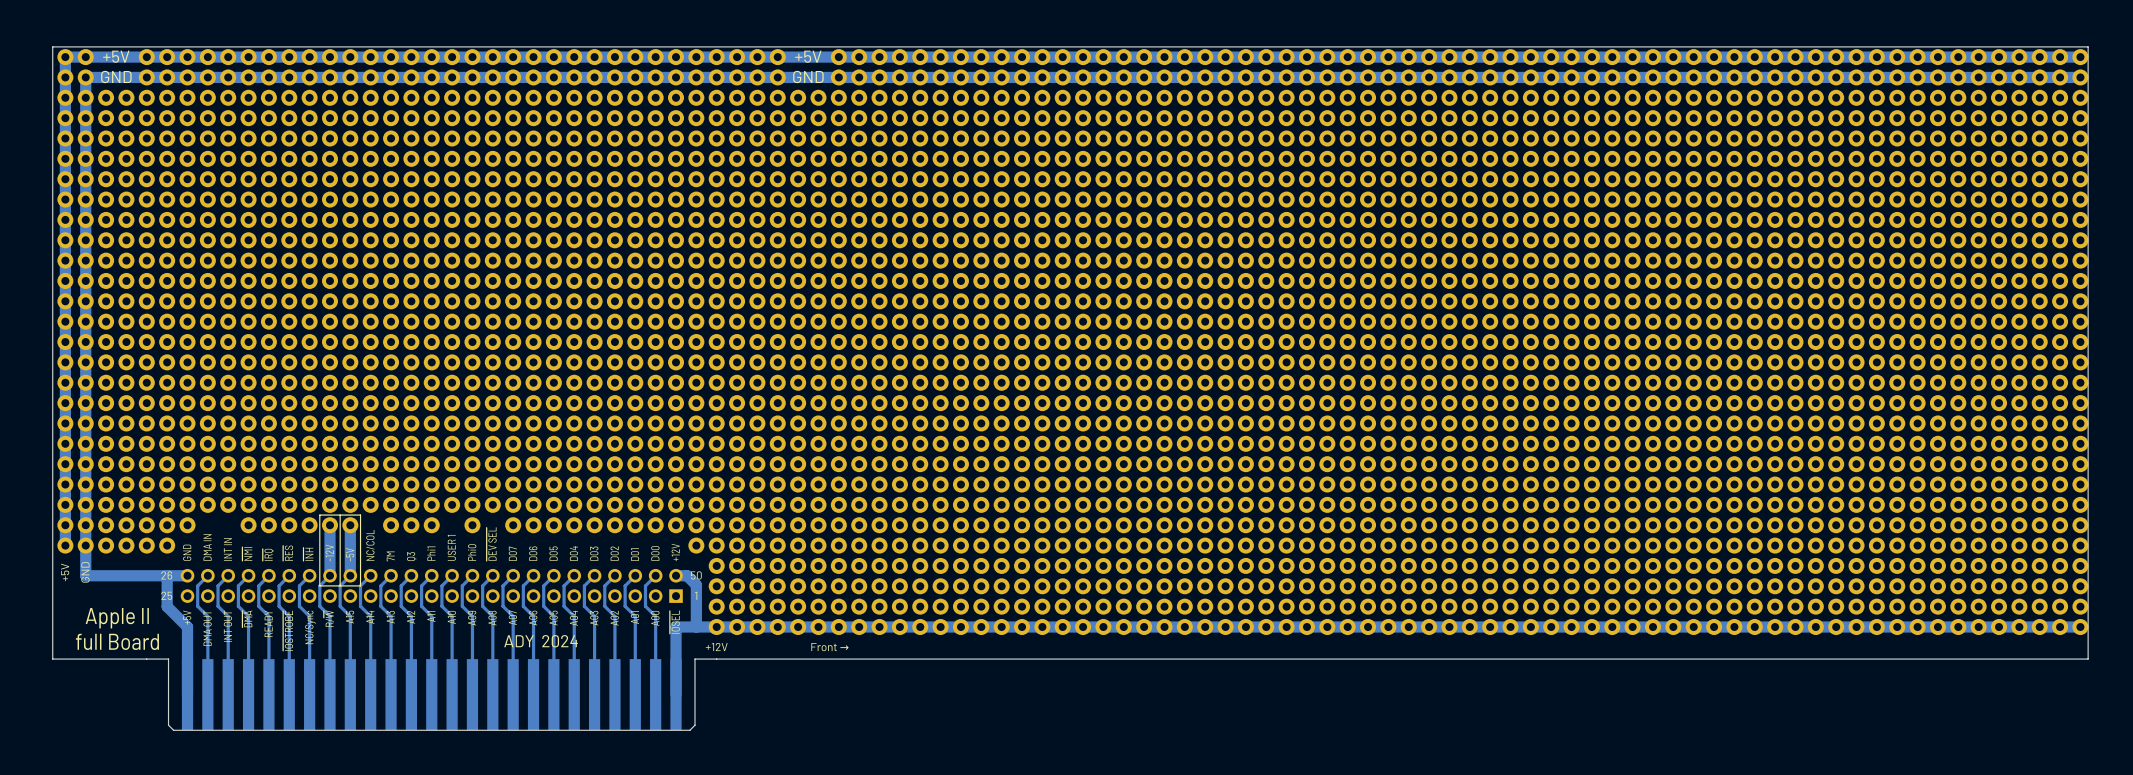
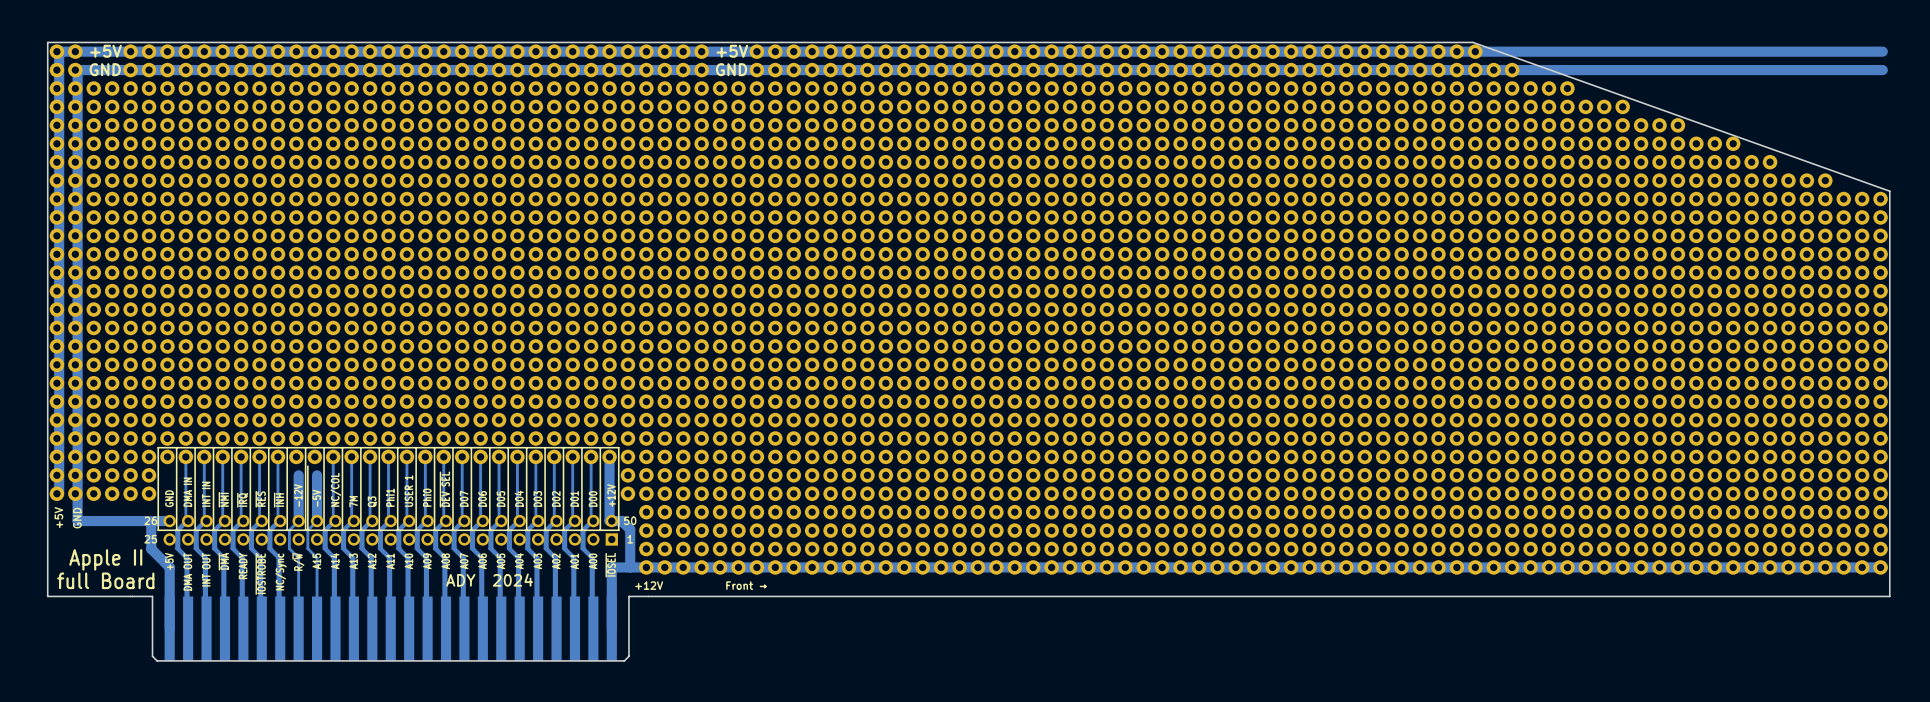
board edge: (1627, 46) (2088, 46) (2088, 211) -> (1473, 42) (1889, 191)
part footprint: [57, 49, 2089, 636] -> [49, 44, 1888, 575]
line: none -> (176, 447) (176, 530)
line: none -> (195, 447) (195, 530)
line: none -> (213, 447) (213, 530)
line: none -> (231, 447) (231, 530)
line: none -> (250, 447) (250, 530)
line: none -> (268, 447) (268, 530)
line: none -> (287, 447) (287, 530)
line: none -> (305, 447) (305, 530)
line: none -> (324, 447) (324, 530)
line: none -> (342, 447) (342, 530)
line: none -> (360, 447) (360, 530)
line: none -> (379, 447) (379, 530)
line: none -> (397, 447) (397, 530)
line: none -> (416, 447) (416, 530)
line: none -> (434, 447) (434, 530)
line: none -> (452, 447) (452, 530)
line: none -> (471, 447) (471, 530)
line: none -> (489, 447) (489, 530)
line: none -> (508, 447) (508, 530)
line: none -> (526, 447) (526, 530)
line: none -> (545, 447) (545, 530)
line: none -> (563, 447) (563, 530)
line: none -> (581, 447) (581, 530)
line: none -> (600, 447) (600, 530)
track: none -> (185, 456) (185, 521) (176, 530) (176, 548) (185, 557) (185, 628)
track: none -> (204, 456) (204, 521) (195, 530) (195, 548) (204, 557) (204, 628)
track: none -> (222, 456) (222, 521) (213, 530) (213, 548) (222, 557) (222, 628)
track: none -> (241, 456) (241, 521) (231, 530) (231, 548) (241, 557) (241, 628)
track: none -> (259, 456) (259, 521) (250, 530) (250, 548) (259, 557) (259, 628)
track: none -> (277, 456) (277, 521) (268, 530) (268, 548) (277, 557) (277, 628)
track: none -> (333, 456) (333, 521) (324, 530) (324, 548) (333, 557) (333, 628)
track: none -> (351, 456) (351, 521) (342, 530) (342, 548) (351, 557) (351, 628)
track: none -> (370, 456) (370, 521) (360, 530) (360, 548) (370, 557) (370, 628)
track: none -> (388, 456) (388, 521) (379, 530) (379, 548) (388, 557) (388, 628)
track: none -> (406, 456) (406, 521) (397, 530) (397, 548) (406, 557) (406, 628)
track: none -> (425, 456) (425, 521) (416, 530) (416, 548) (425, 557) (425, 628)
track: none -> (443, 456) (443, 521) (434, 530) (434, 548) (443, 557) (443, 628)
track: none -> (462, 456) (462, 521) (452, 530) (452, 548) (462, 557) (462, 628)
track: none -> (480, 456) (480, 521) (471, 530) (471, 548) (480, 557) (480, 628)
track: none -> (499, 456) (499, 521) (489, 530) (489, 548) (499, 557) (499, 628)
track: none -> (517, 456) (517, 521) (508, 530) (508, 548) (517, 557) (517, 628)
track: none -> (535, 456) (535, 521) (526, 530) (526, 548) (535, 557) (535, 628)
track: none -> (554, 456) (554, 521) (545, 530) (545, 548) (554, 557) (554, 628)
track: none -> (572, 456) (572, 521) (563, 530) (563, 548) (572, 557) (572, 628)
track: none -> (591, 456) (591, 521) (581, 530) (581, 548) (591, 557) (591, 628)
track: none -> (609, 456) (609, 521) (611, 521)
line: (360, 585) (360, 515) (319, 515) (319, 585) -> (326, 530) (618, 530) (618, 447) (158, 447) (158, 530) (289, 530)

